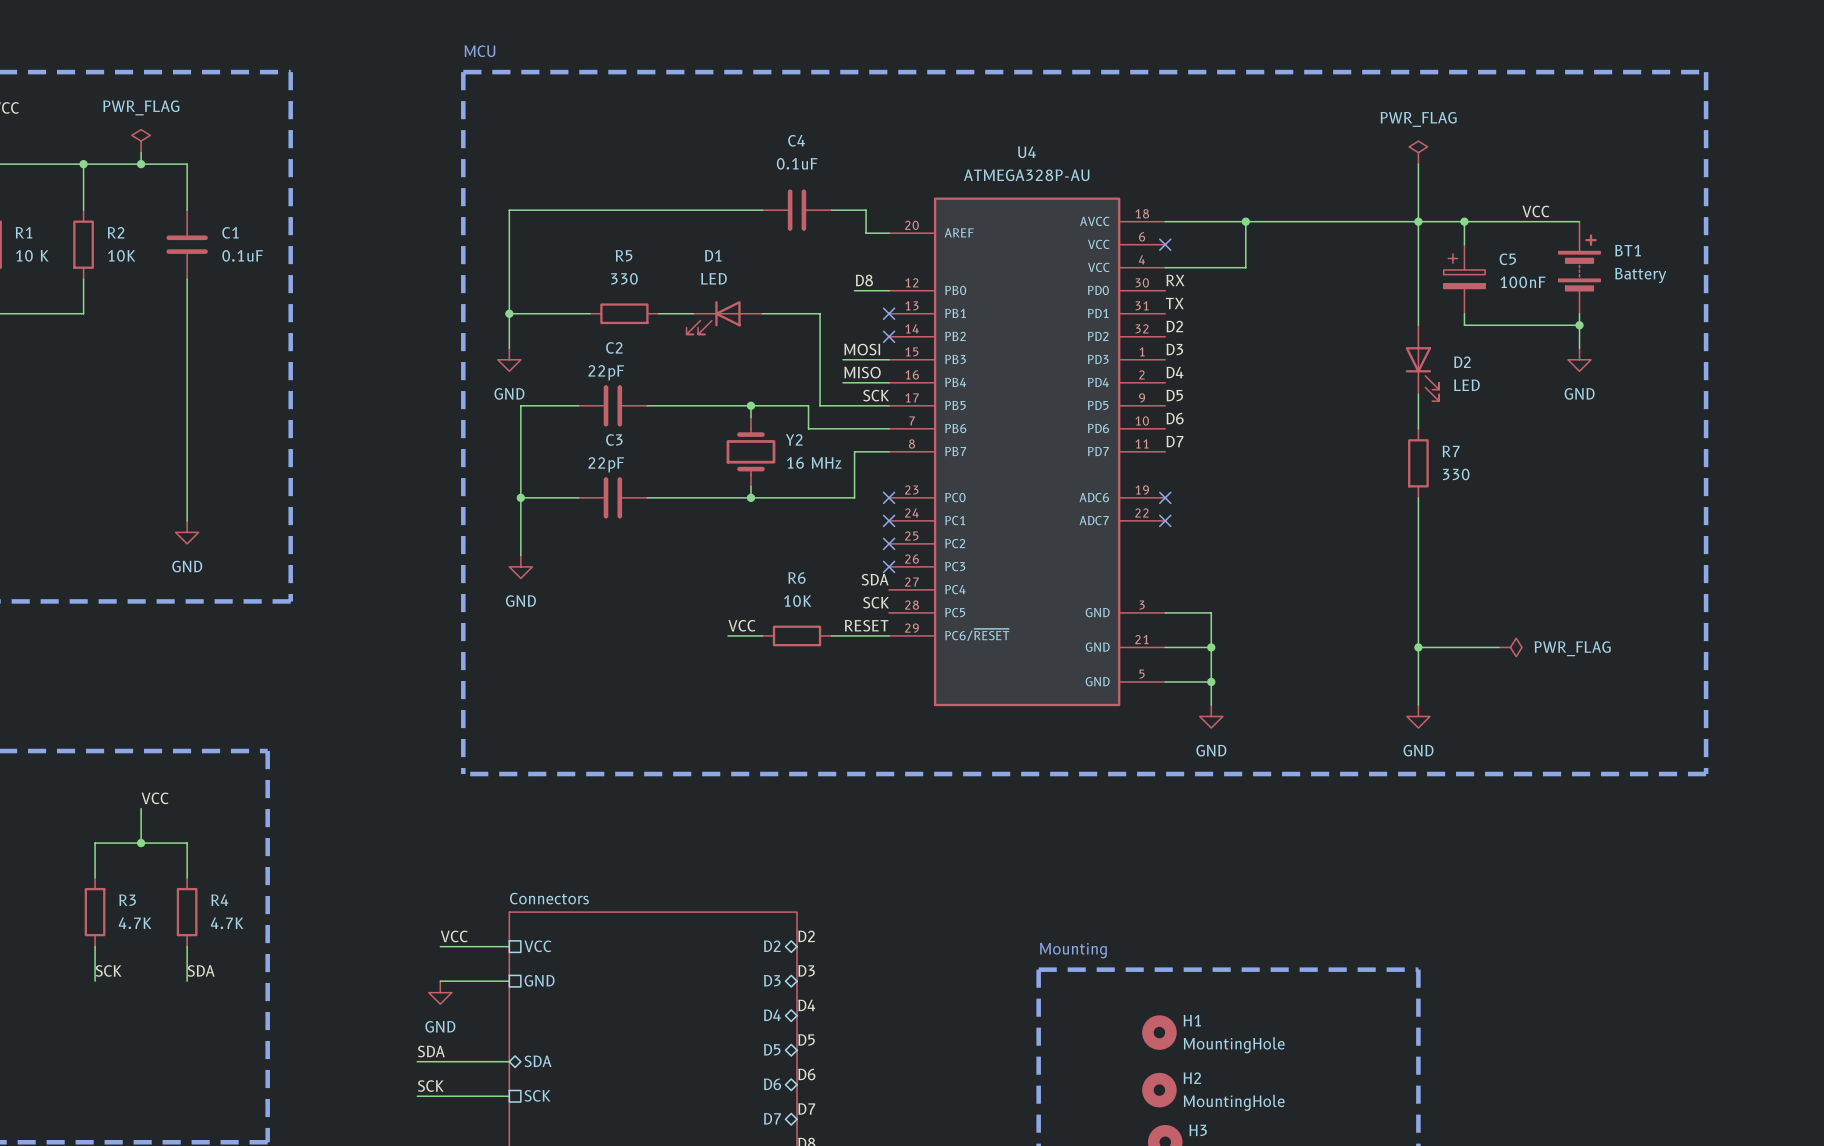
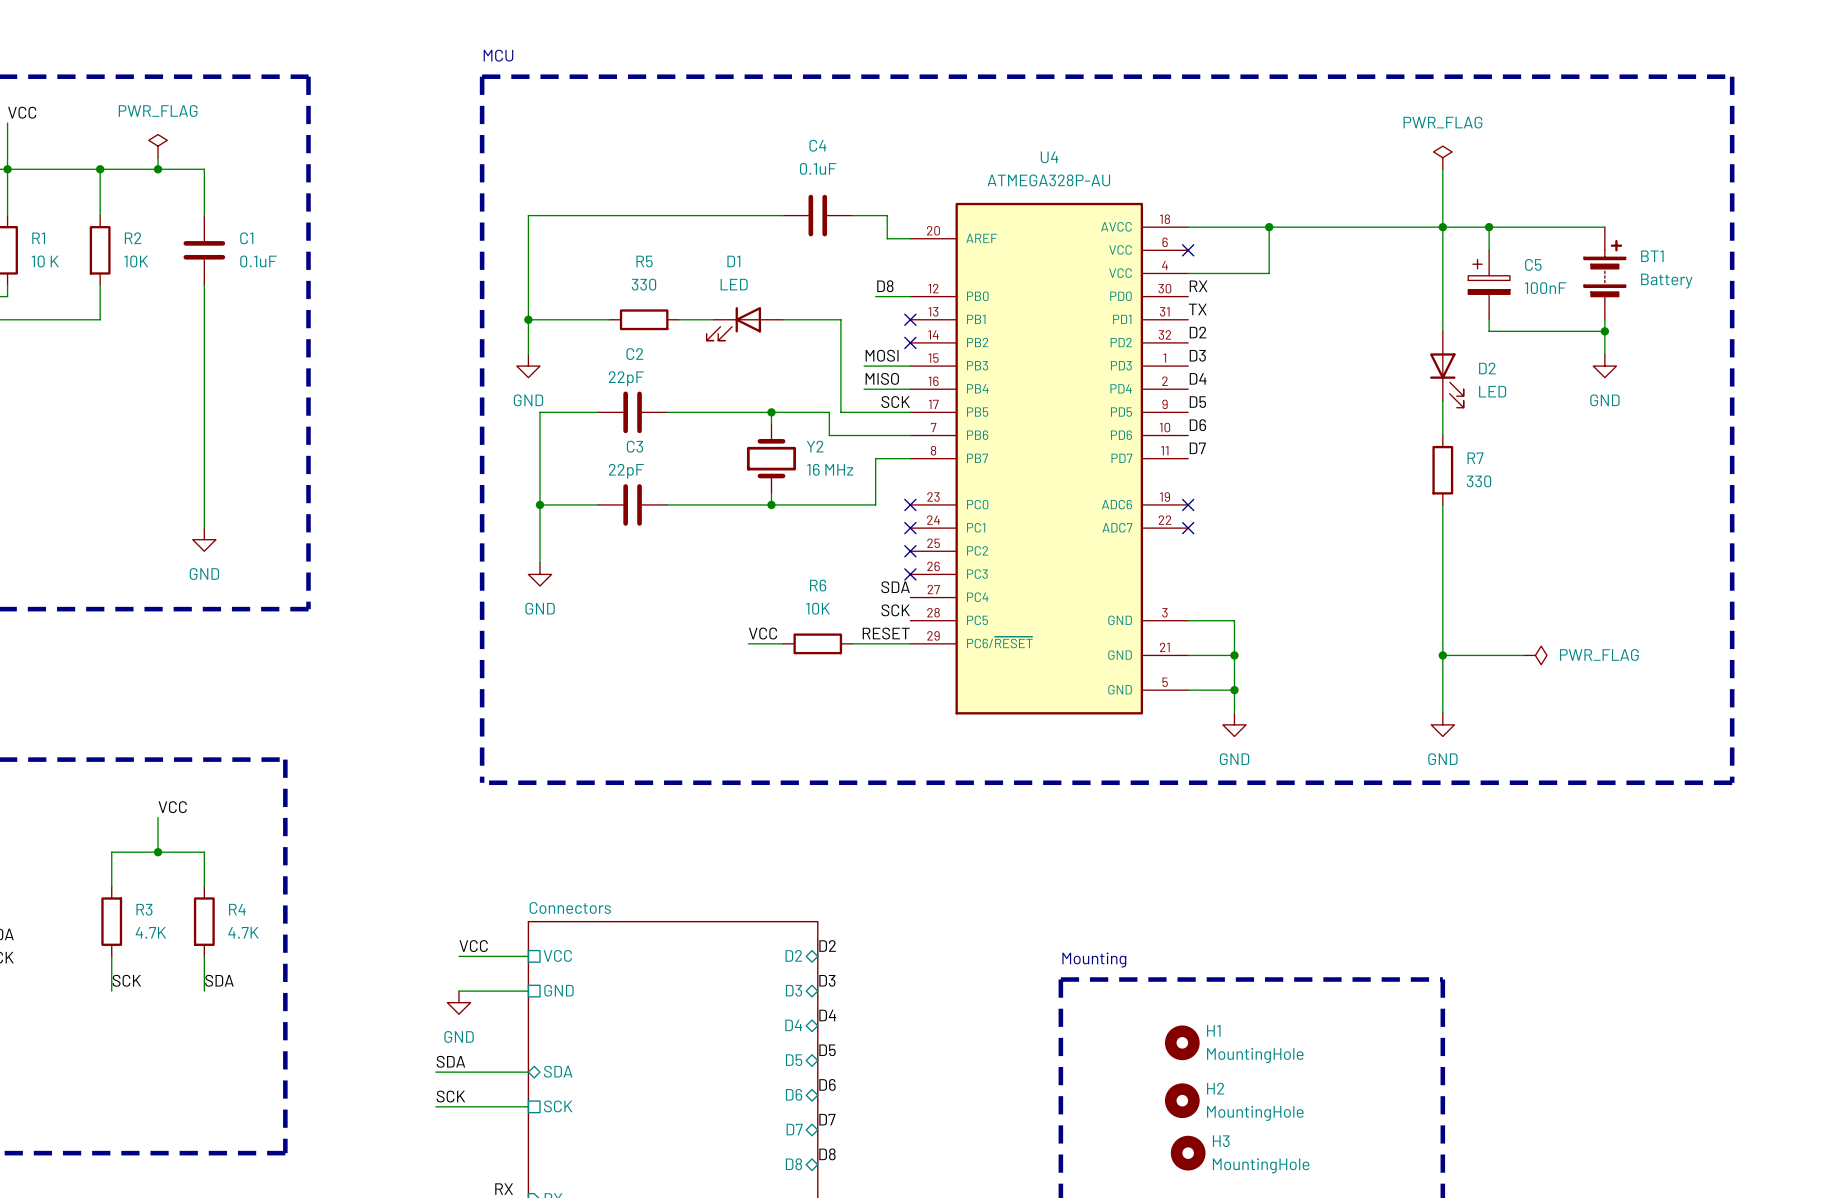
label: VCC (1535, 211) -> none

